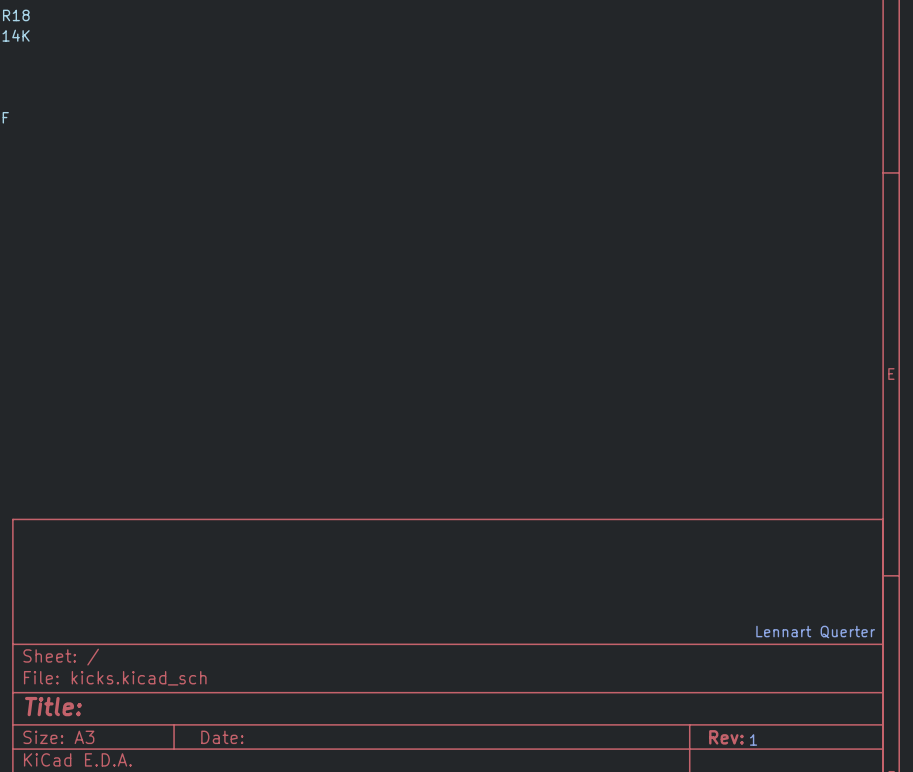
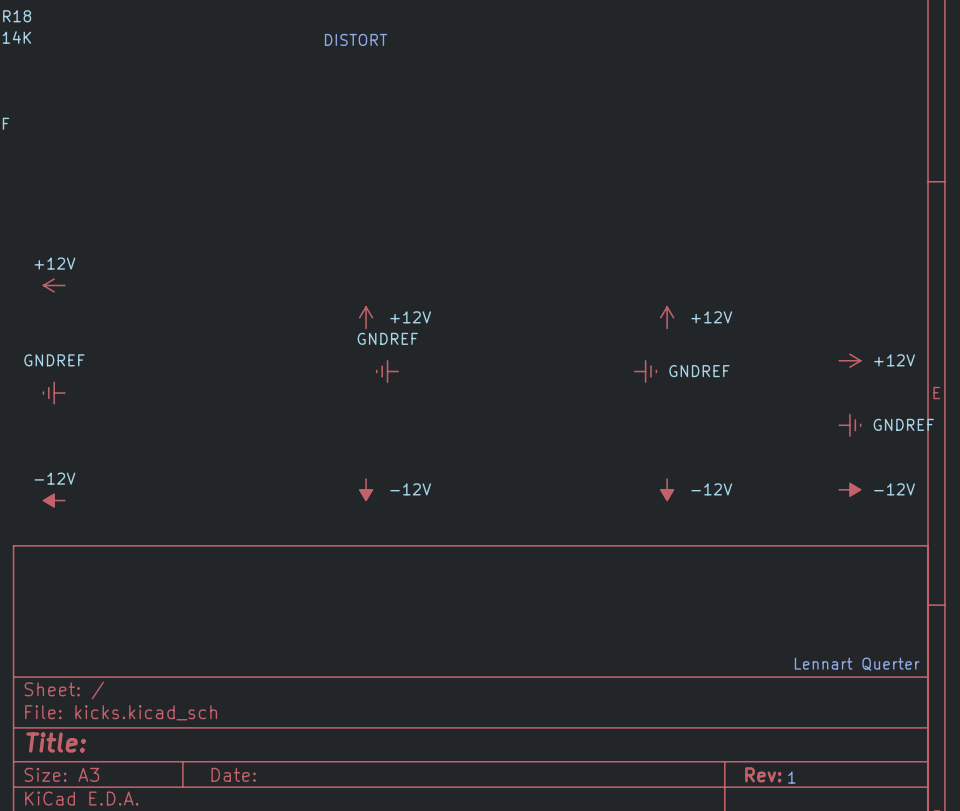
text: none -> DISTORT (356, 39)
power symbol: none -> +12V (54, 285)
power symbol: none -> +12V (366, 317)
power symbol: none -> +12V (667, 317)
power symbol: none -> +12V (849, 360)
power symbol: none -> GNDREF (387, 371)
power symbol: none -> GNDREF (645, 371)
power symbol: none -> GNDREF (54, 393)
power symbol: none -> GNDREF (849, 425)
power symbol: none -> -12V (366, 489)
power symbol: none -> -12V (667, 489)
power symbol: none -> -12V (849, 489)
power symbol: none -> -12V (54, 500)

